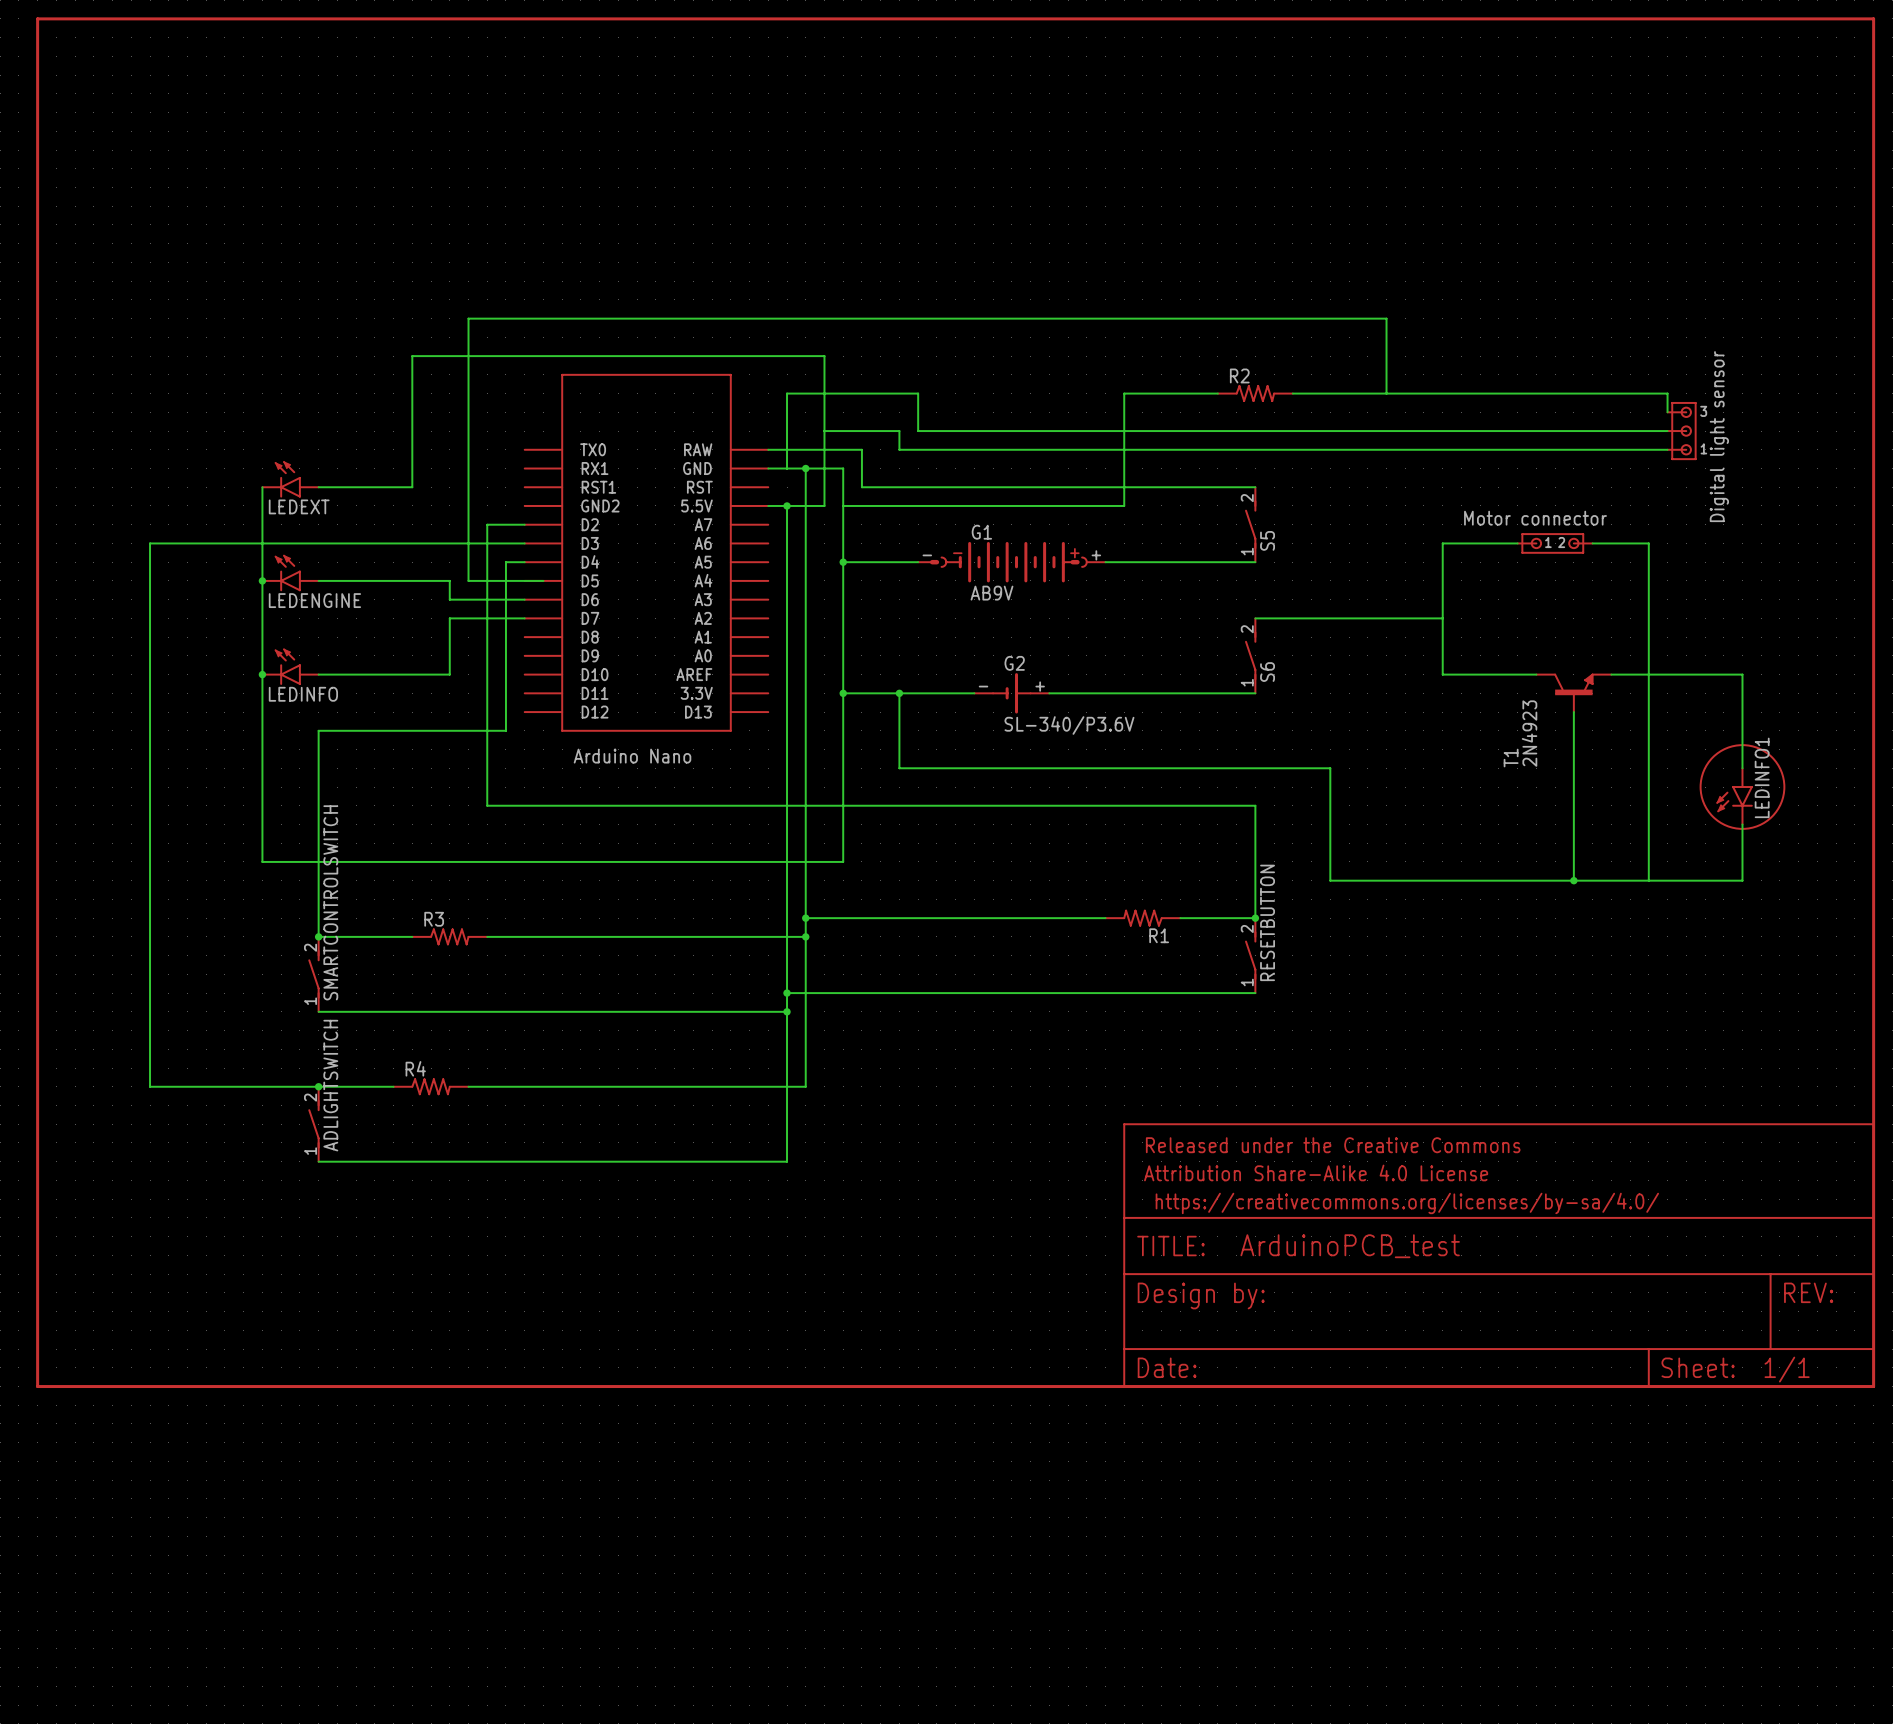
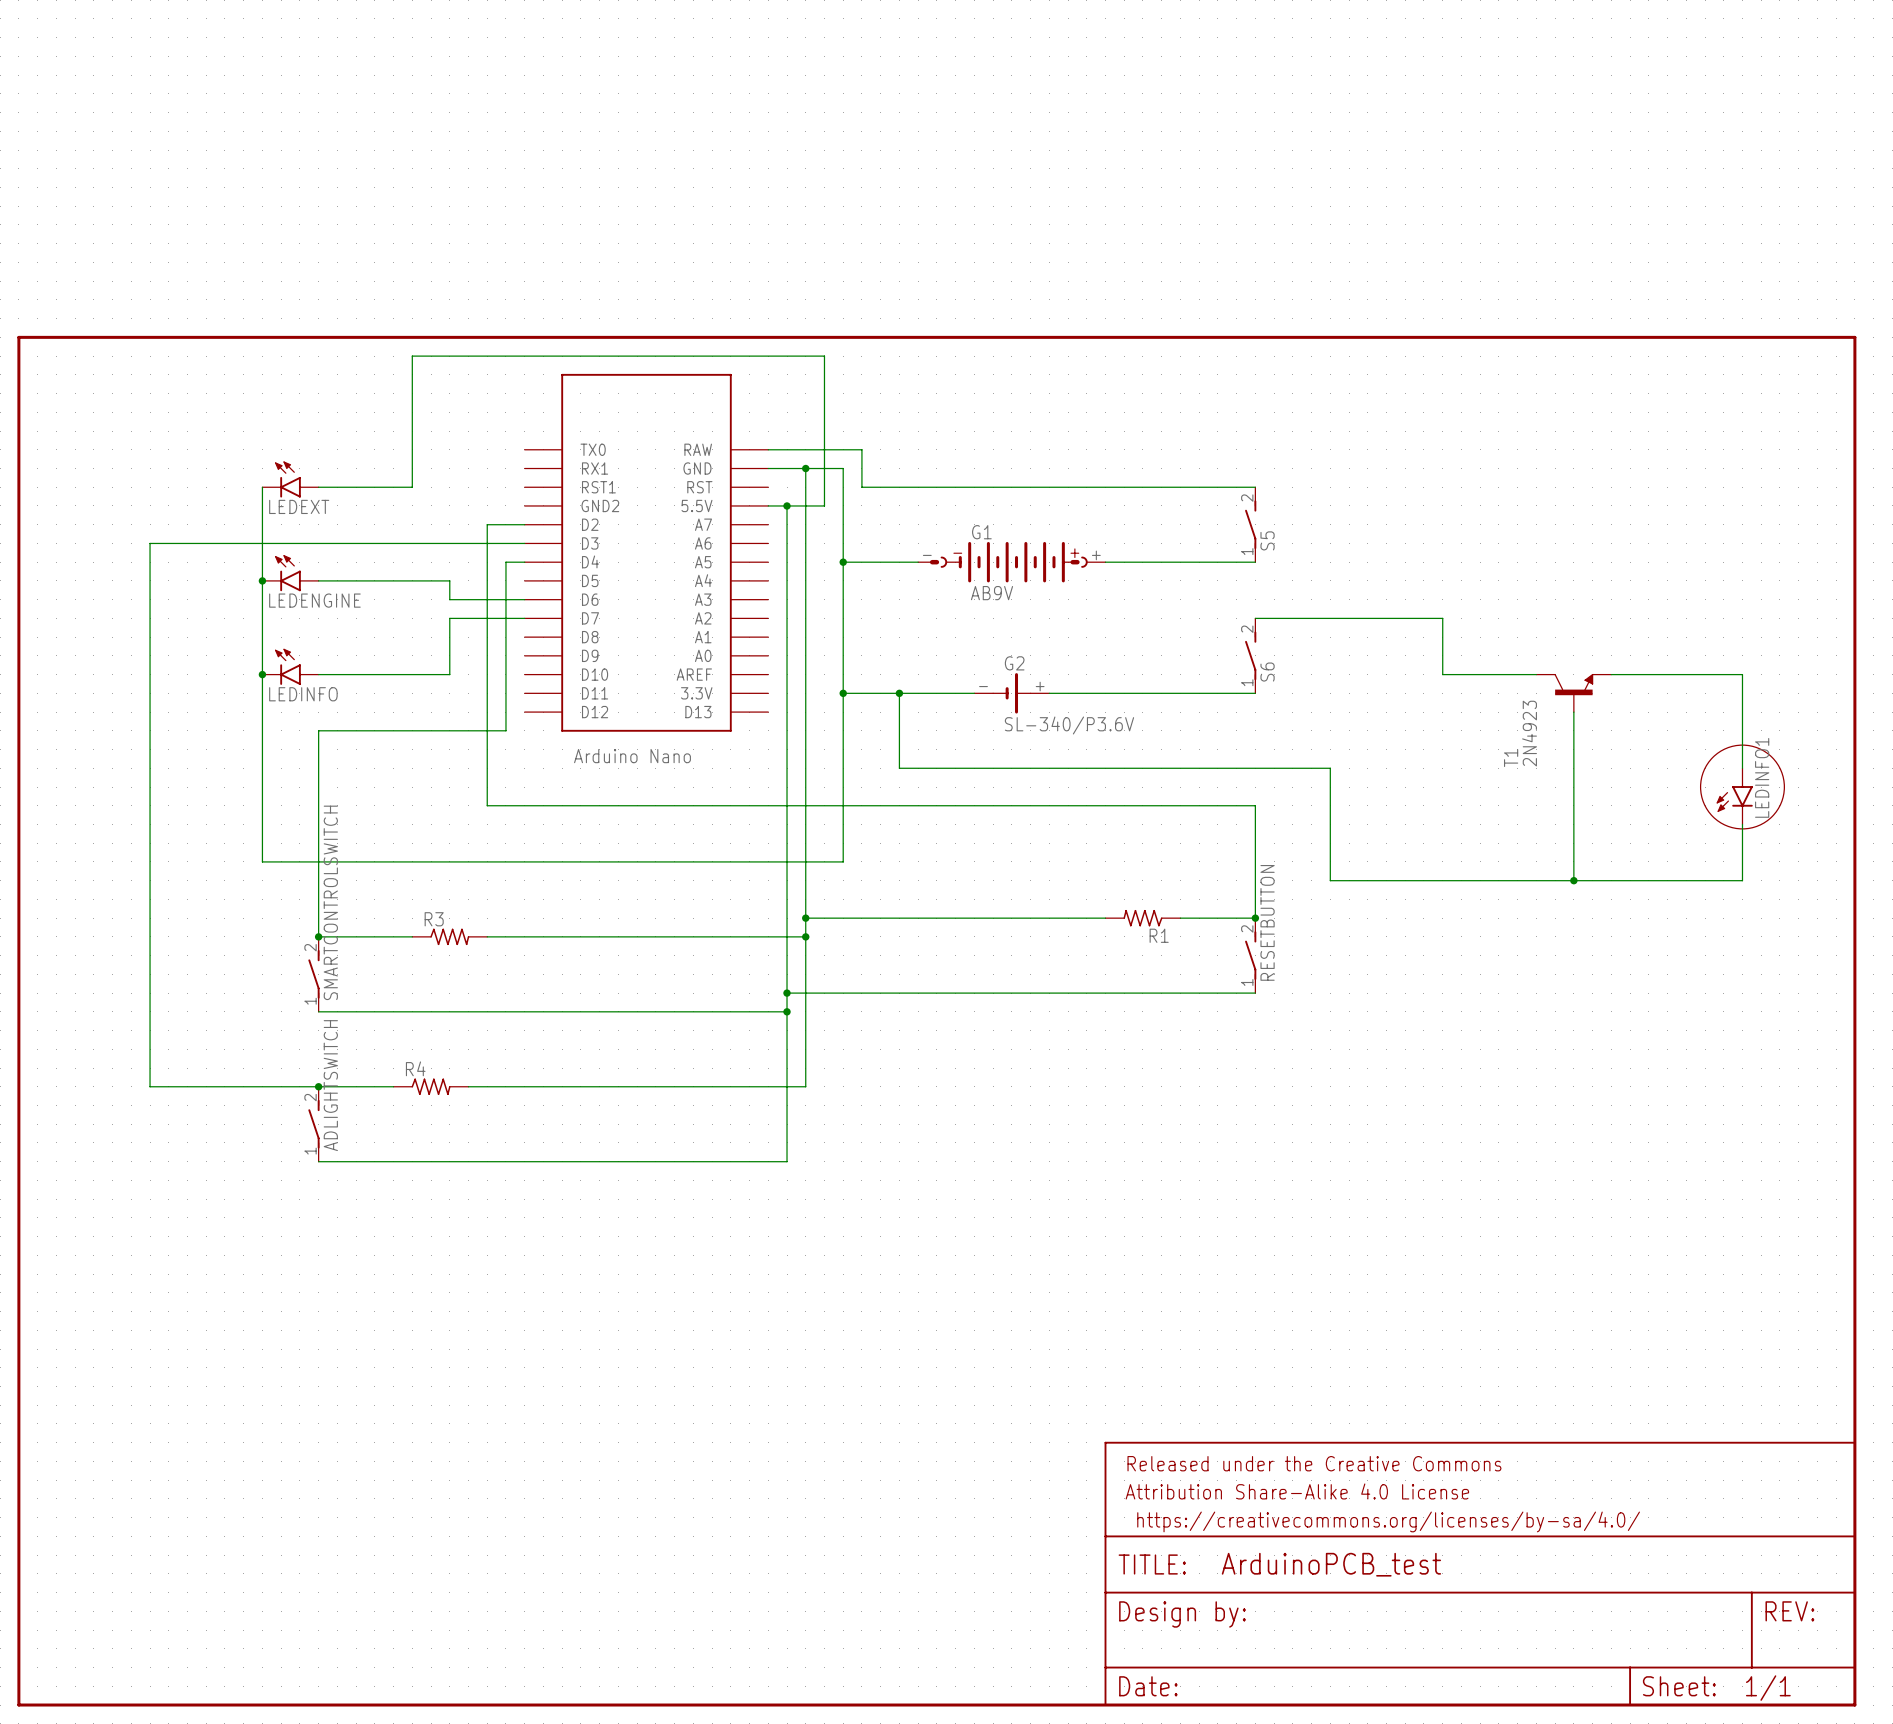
wire: (1217, 393) (1124, 393) (1124, 505) (843, 505) -> none
R2: (1255, 393) -> none
wire: (1292, 393) (1667, 393) (1667, 412) -> none
wire: (1386, 393) (1386, 318) (468, 318) (468, 580) (543, 580) -> none
wire: (824, 431) (899, 431) (899, 449) (1667, 449) -> none
wire: (1667, 431) (918, 431) (918, 393) (787, 393) (787, 468) -> none
part: (1682, 431) -> none
wire: (1517, 543) (1442, 543) (1442, 618) -> none
part: (1555, 543) -> none
wire: (1592, 543) (1648, 543) (1648, 880) -> none
part: (955, 702) -> none
part: none -> (936, 1021)
part: (1498, 1255) -> none
part: none -> (1480, 1573)

